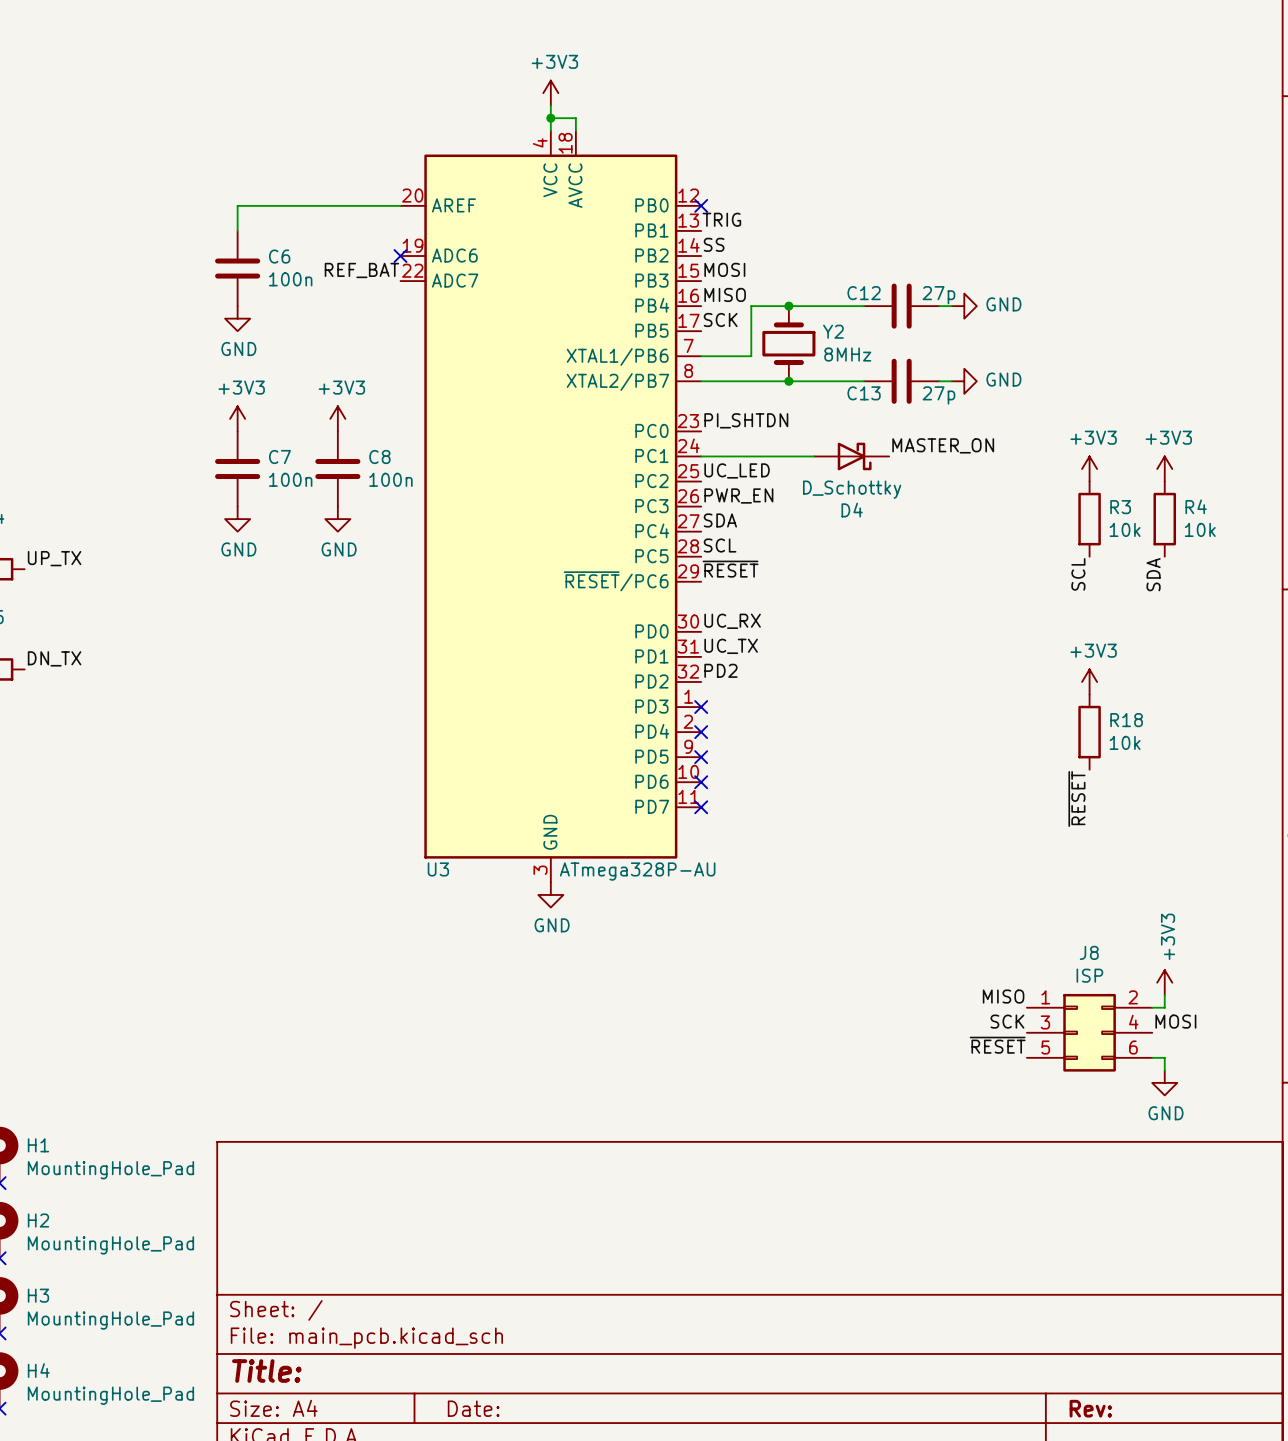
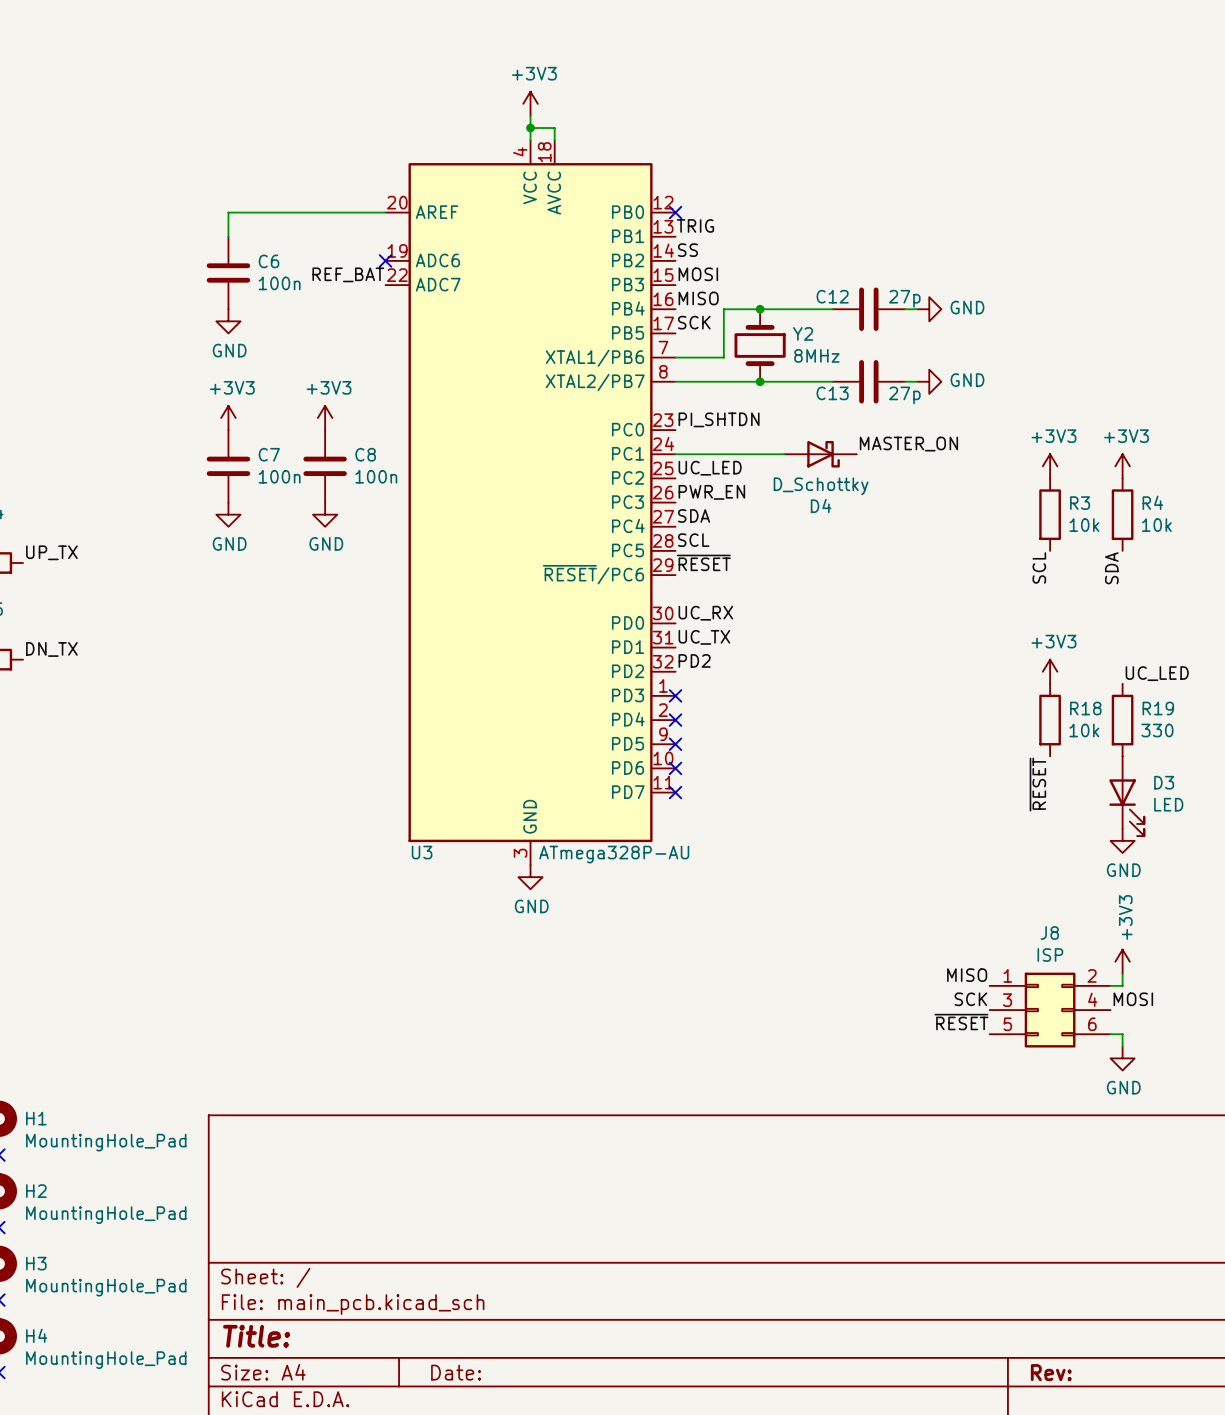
label: none -> UC_LED (1157, 673)
R19: none -> 330 (1122, 720)
D3: none -> LED (1126, 796)
power symbol: none -> GND (1122, 840)

